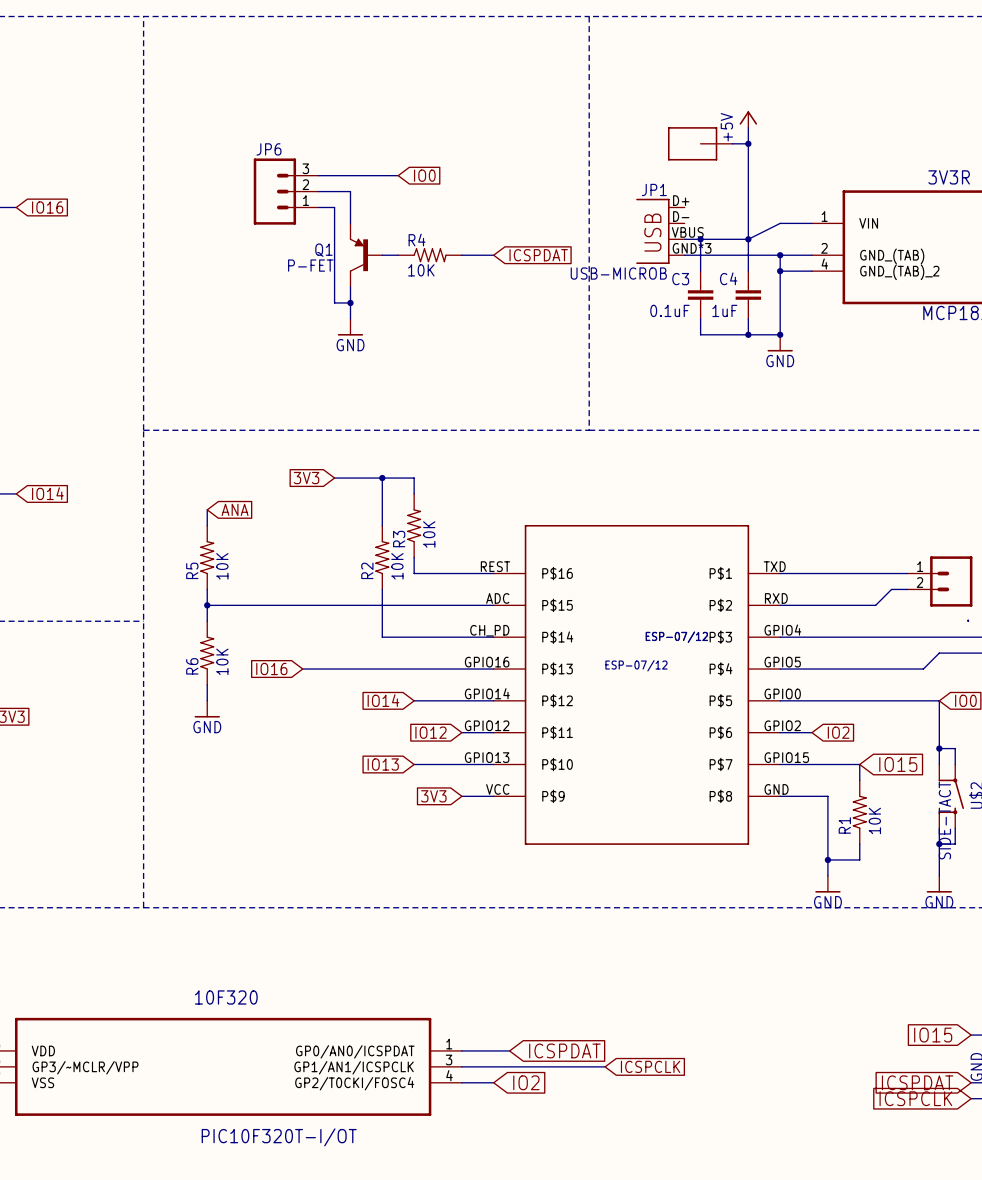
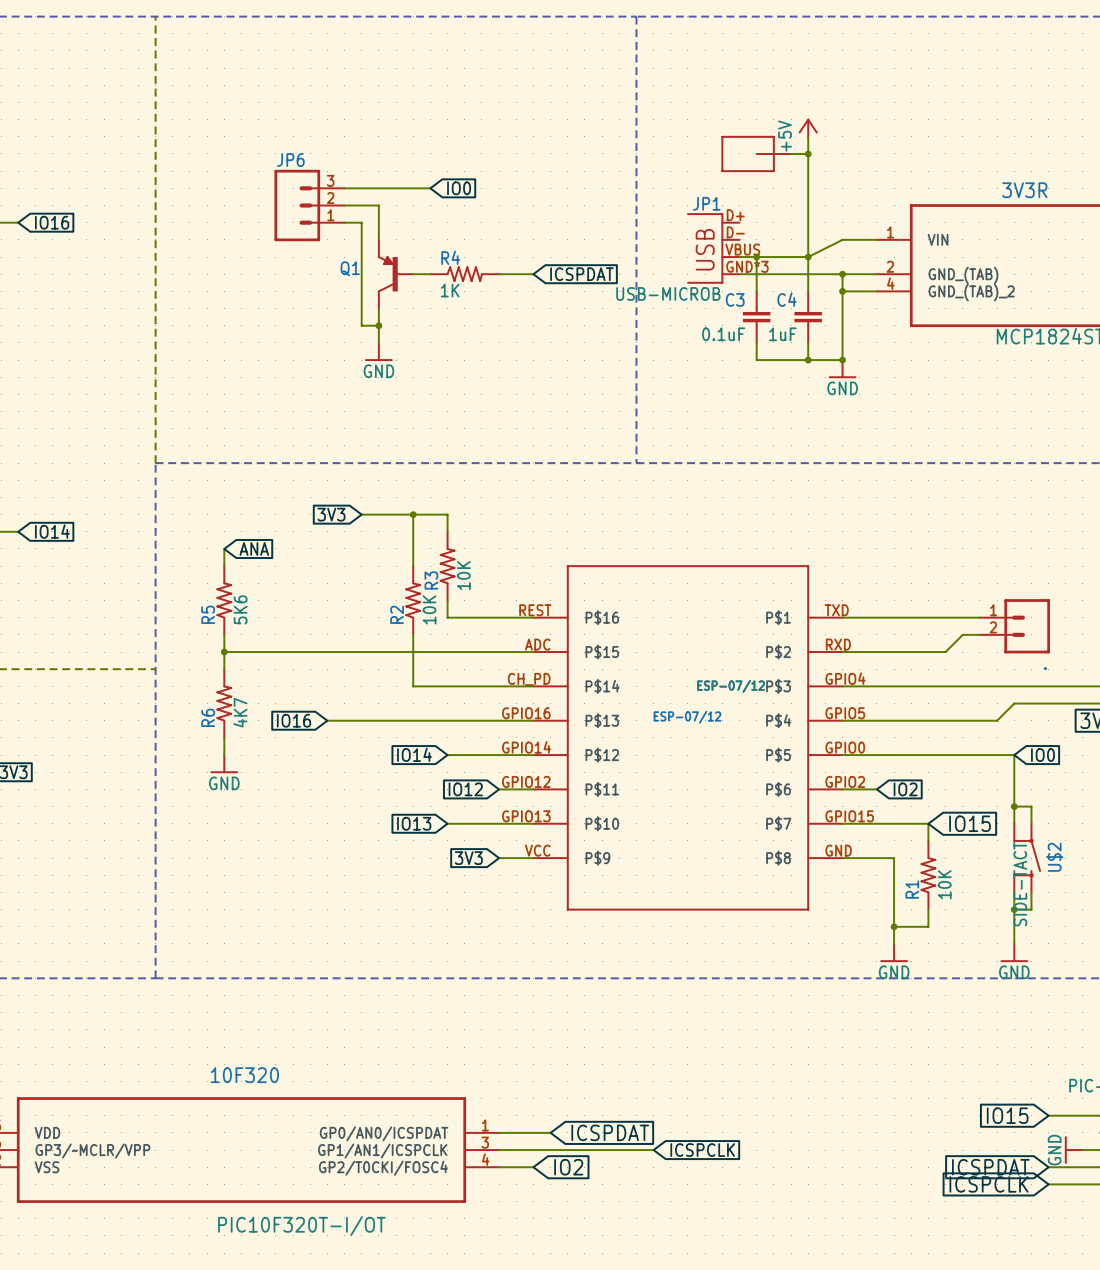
Q1 value: P-FET (310, 265) -> none
R4 value: 10K (421, 270) -> 1K (450, 290)
R5 value: 10K (222, 566) -> 5K6 (240, 609)
R6 value: 10K (222, 661) -> 4K7 (240, 712)

